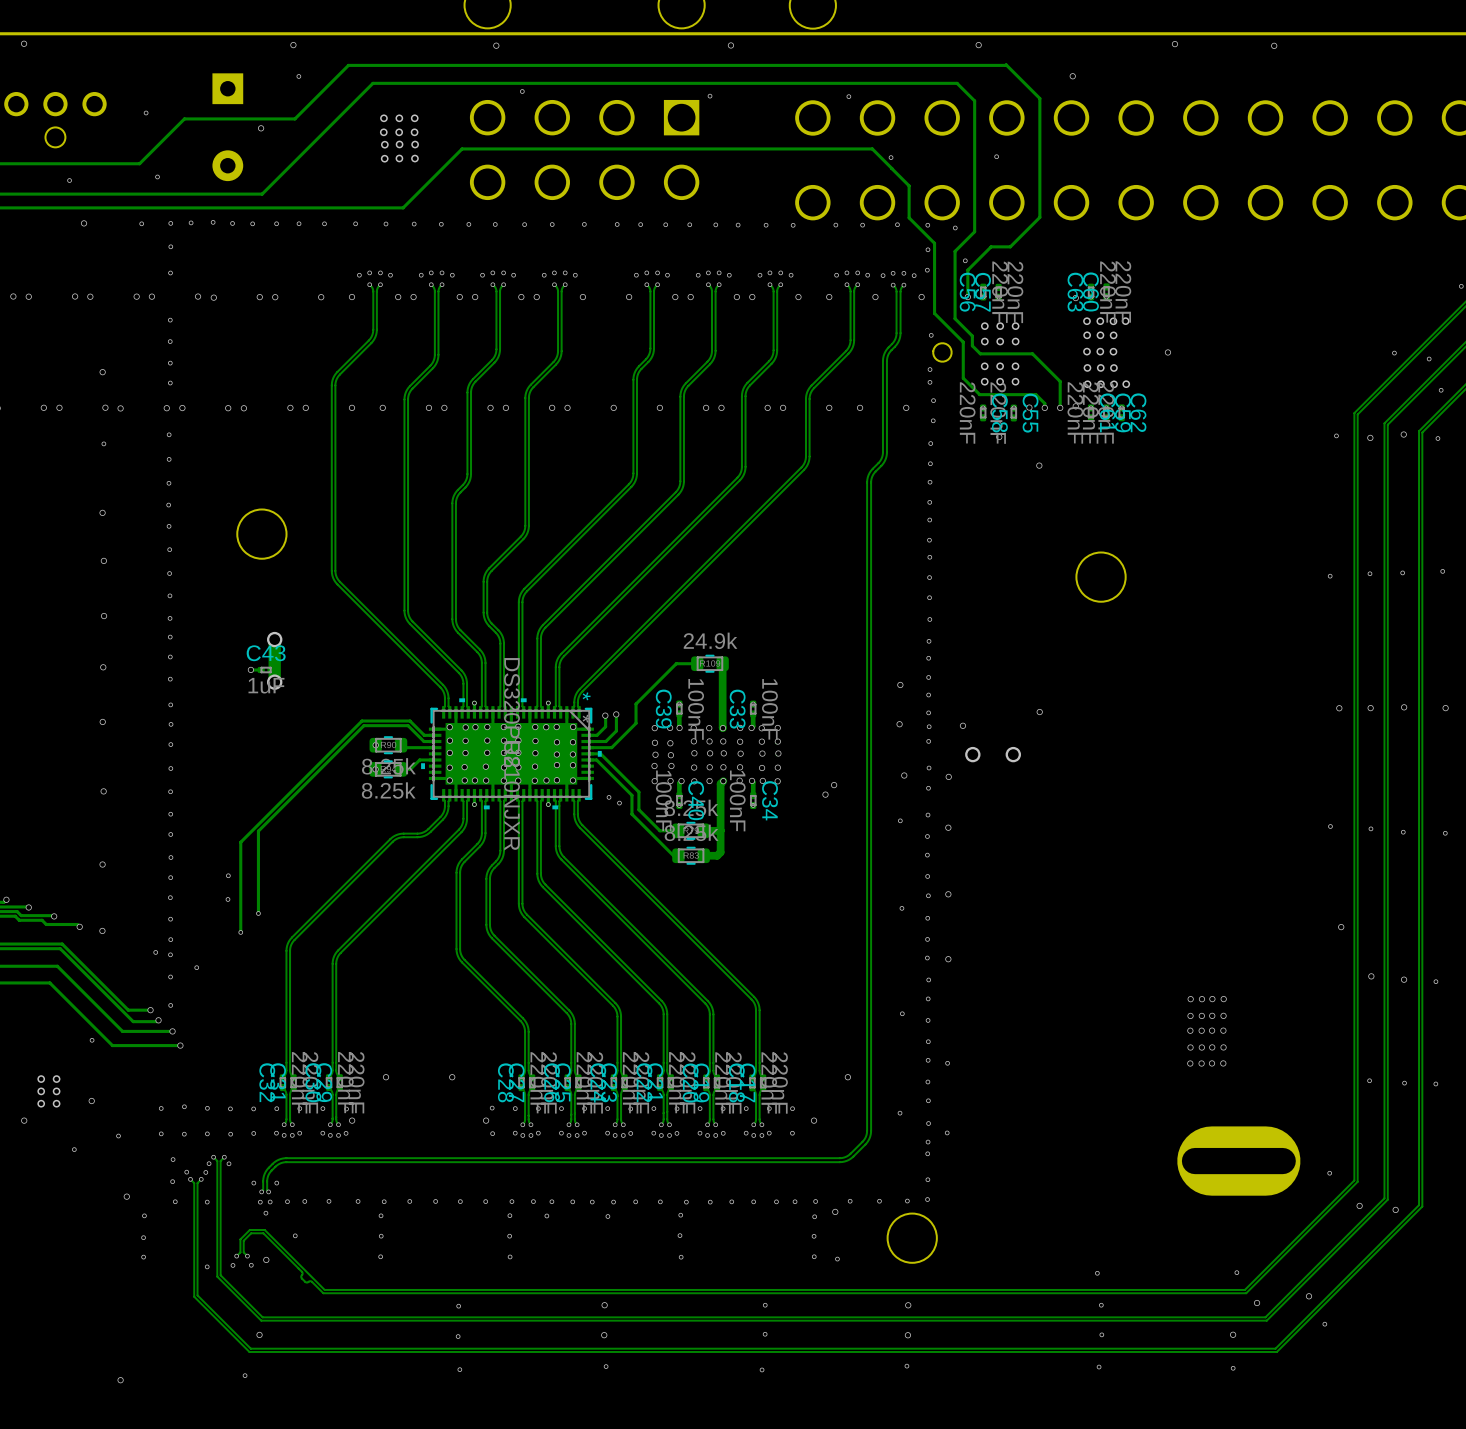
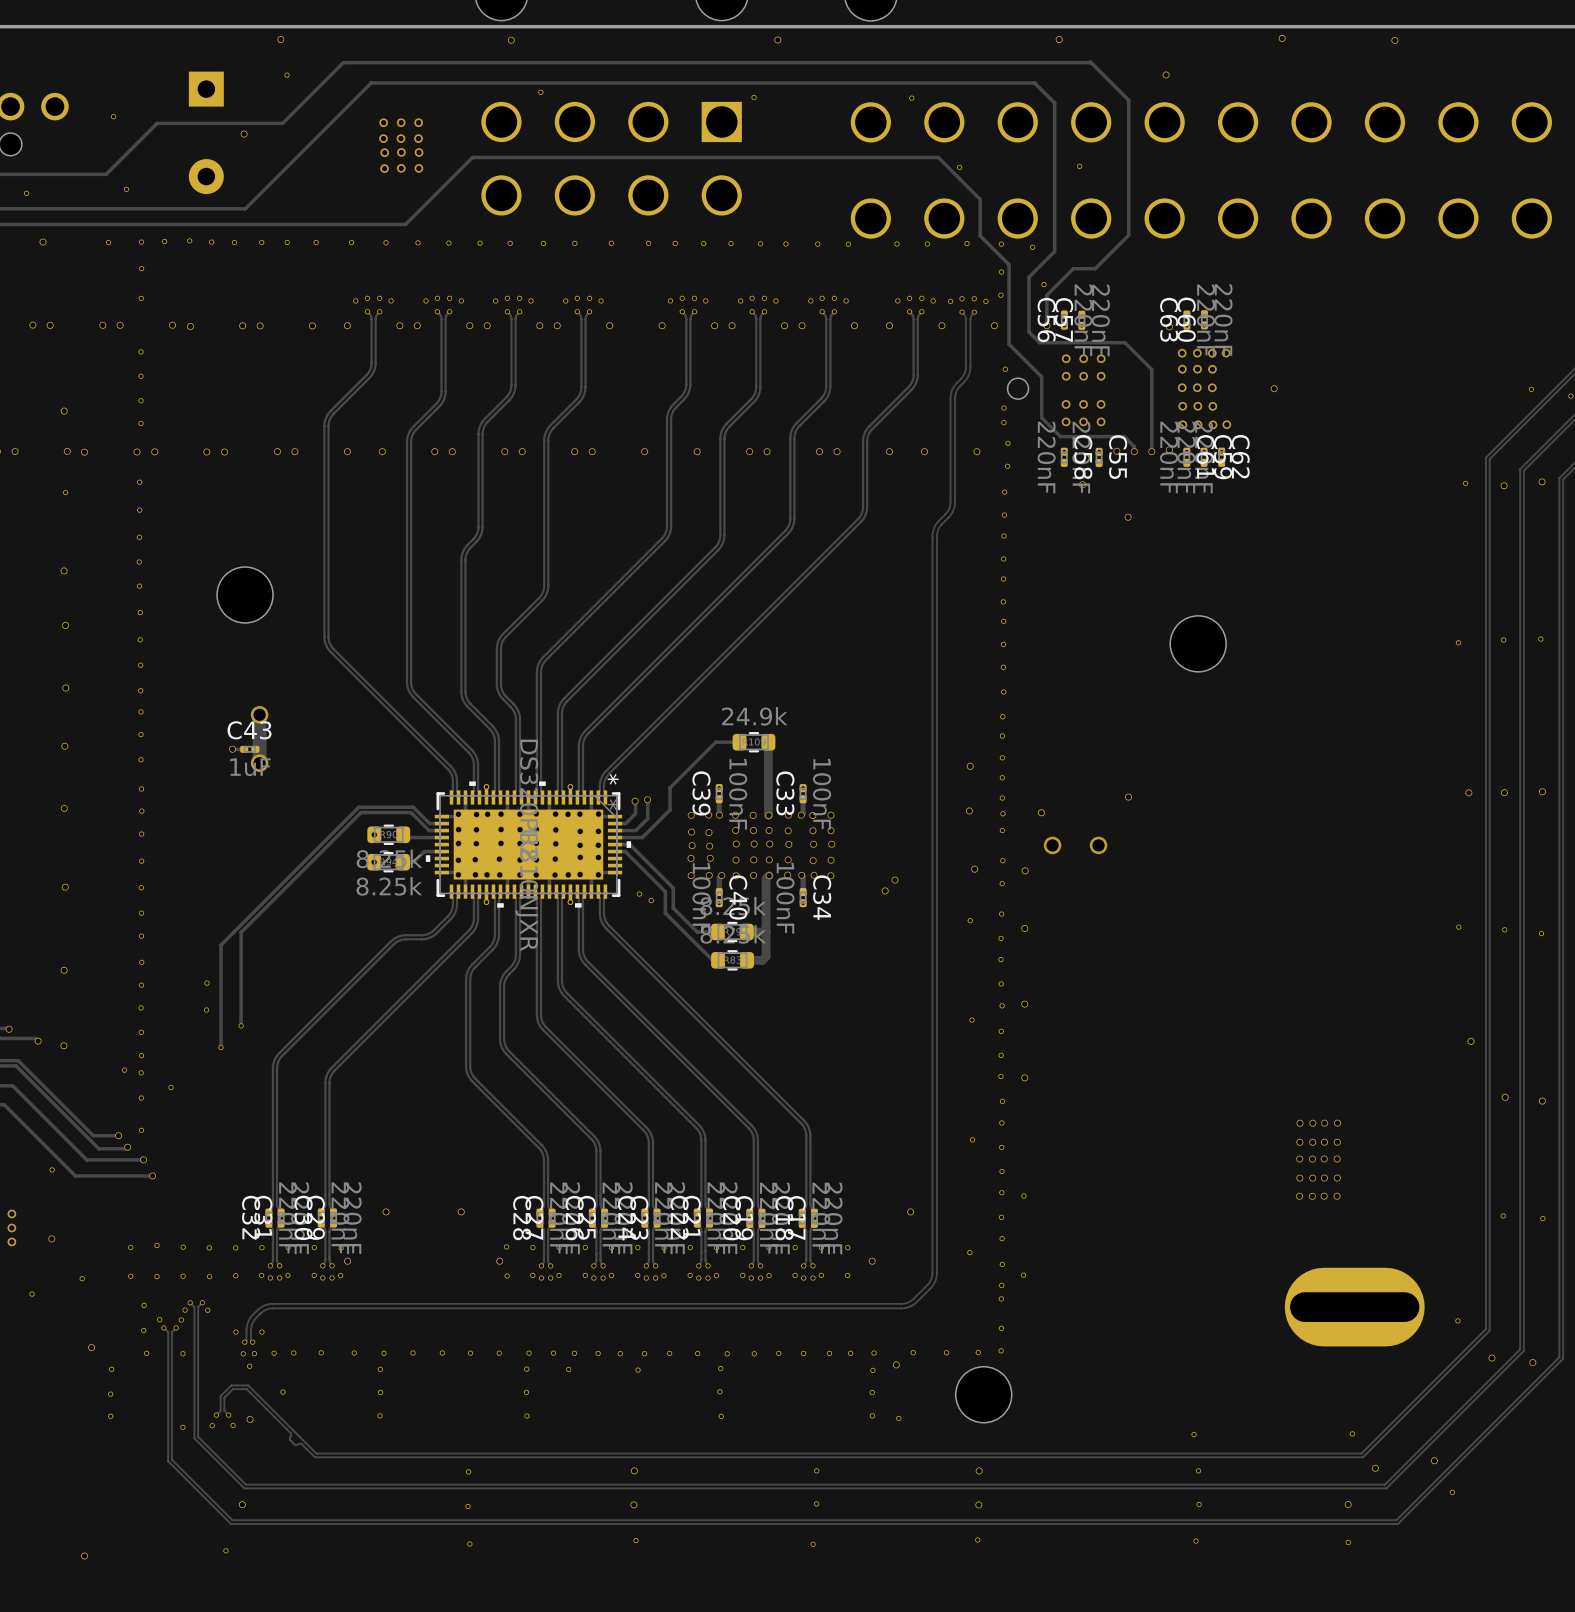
track: (955, 251) (955, 318) (972, 336) (972, 345) (980, 353) (1032, 353) (1060, 381) -> (1032, 273) (1028, 277) (1028, 331) (1039, 342) (1125, 342) (1151, 369) (1151, 421)

